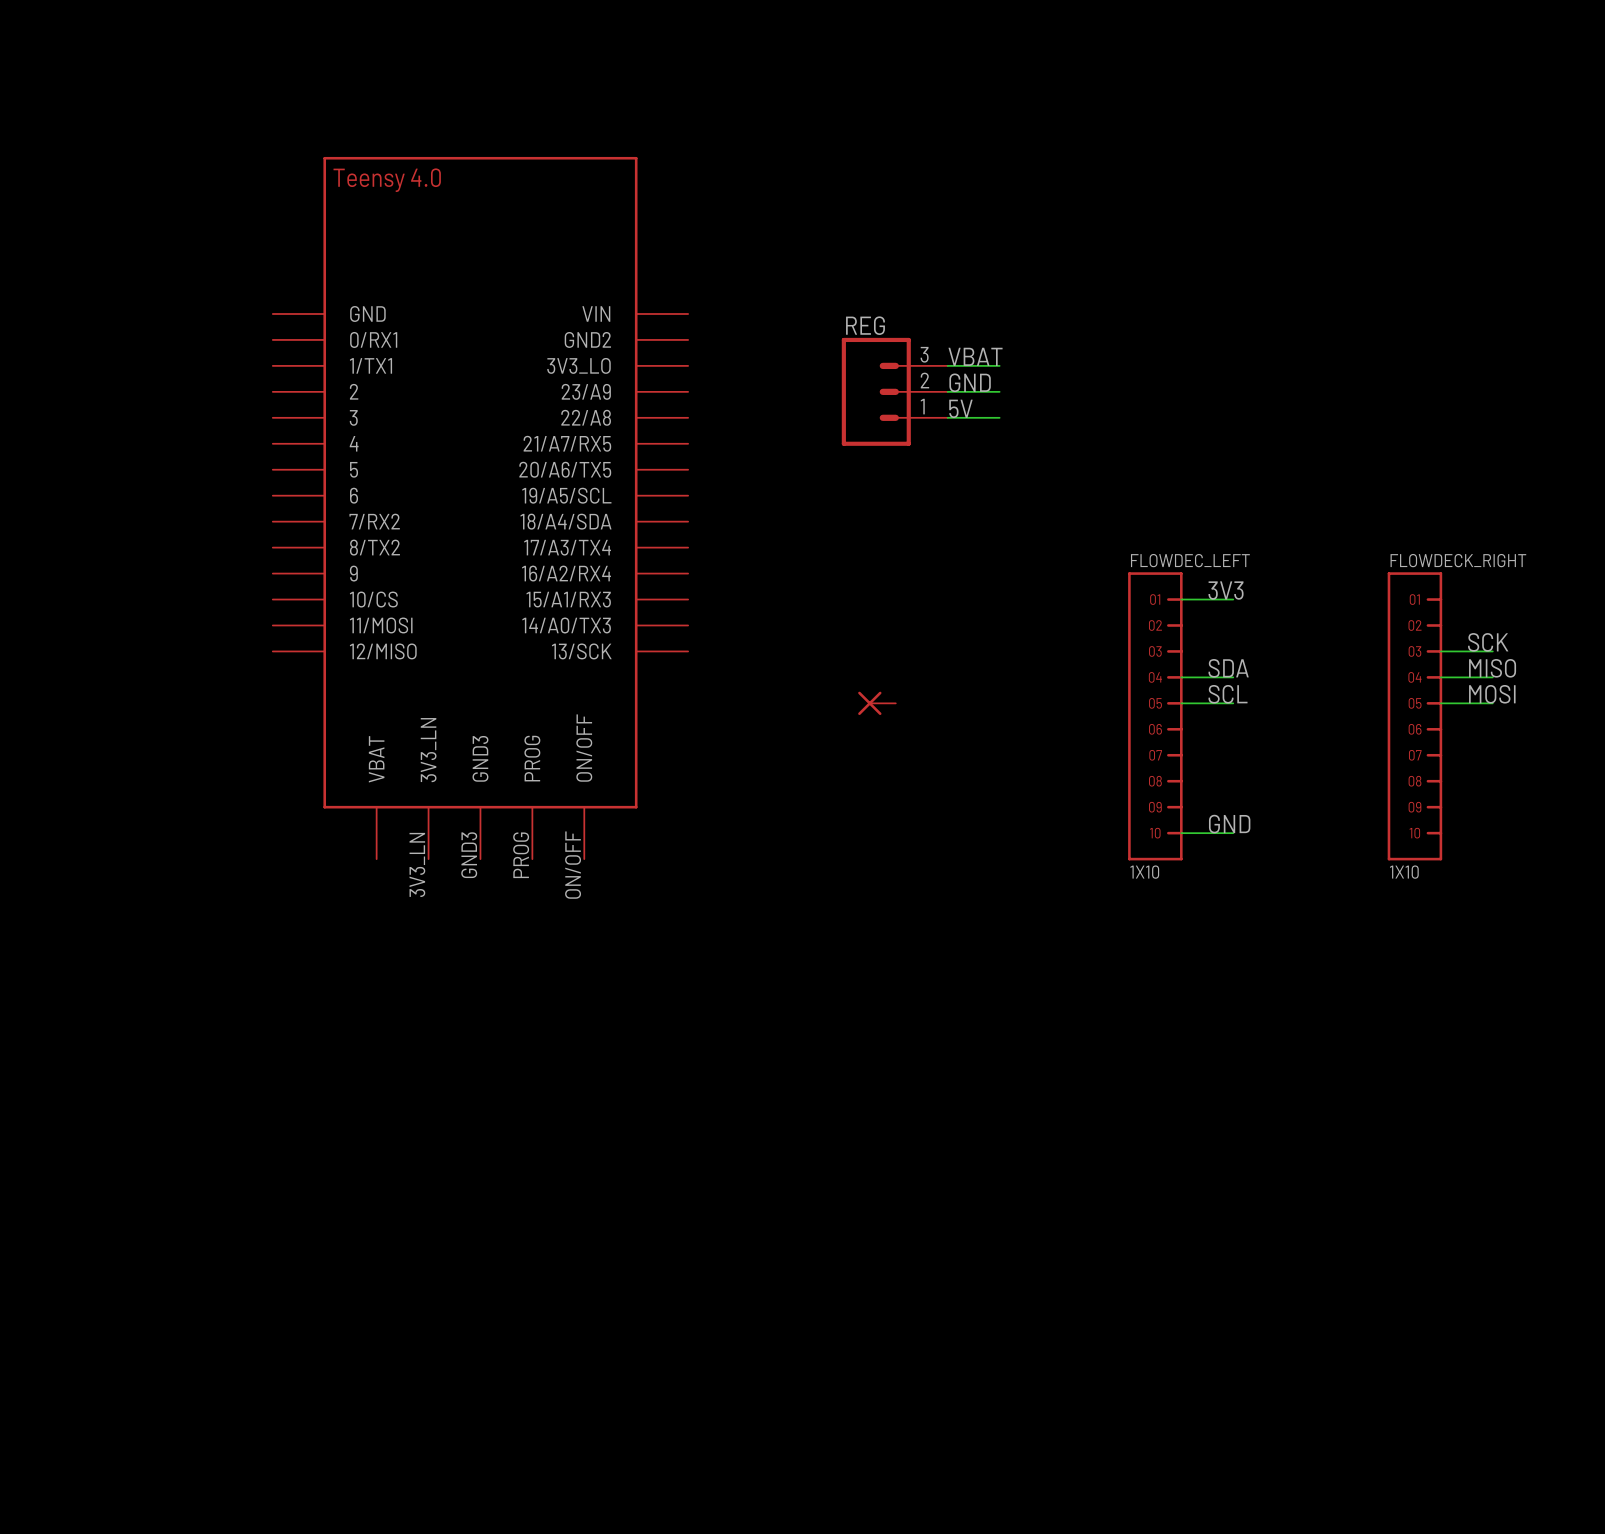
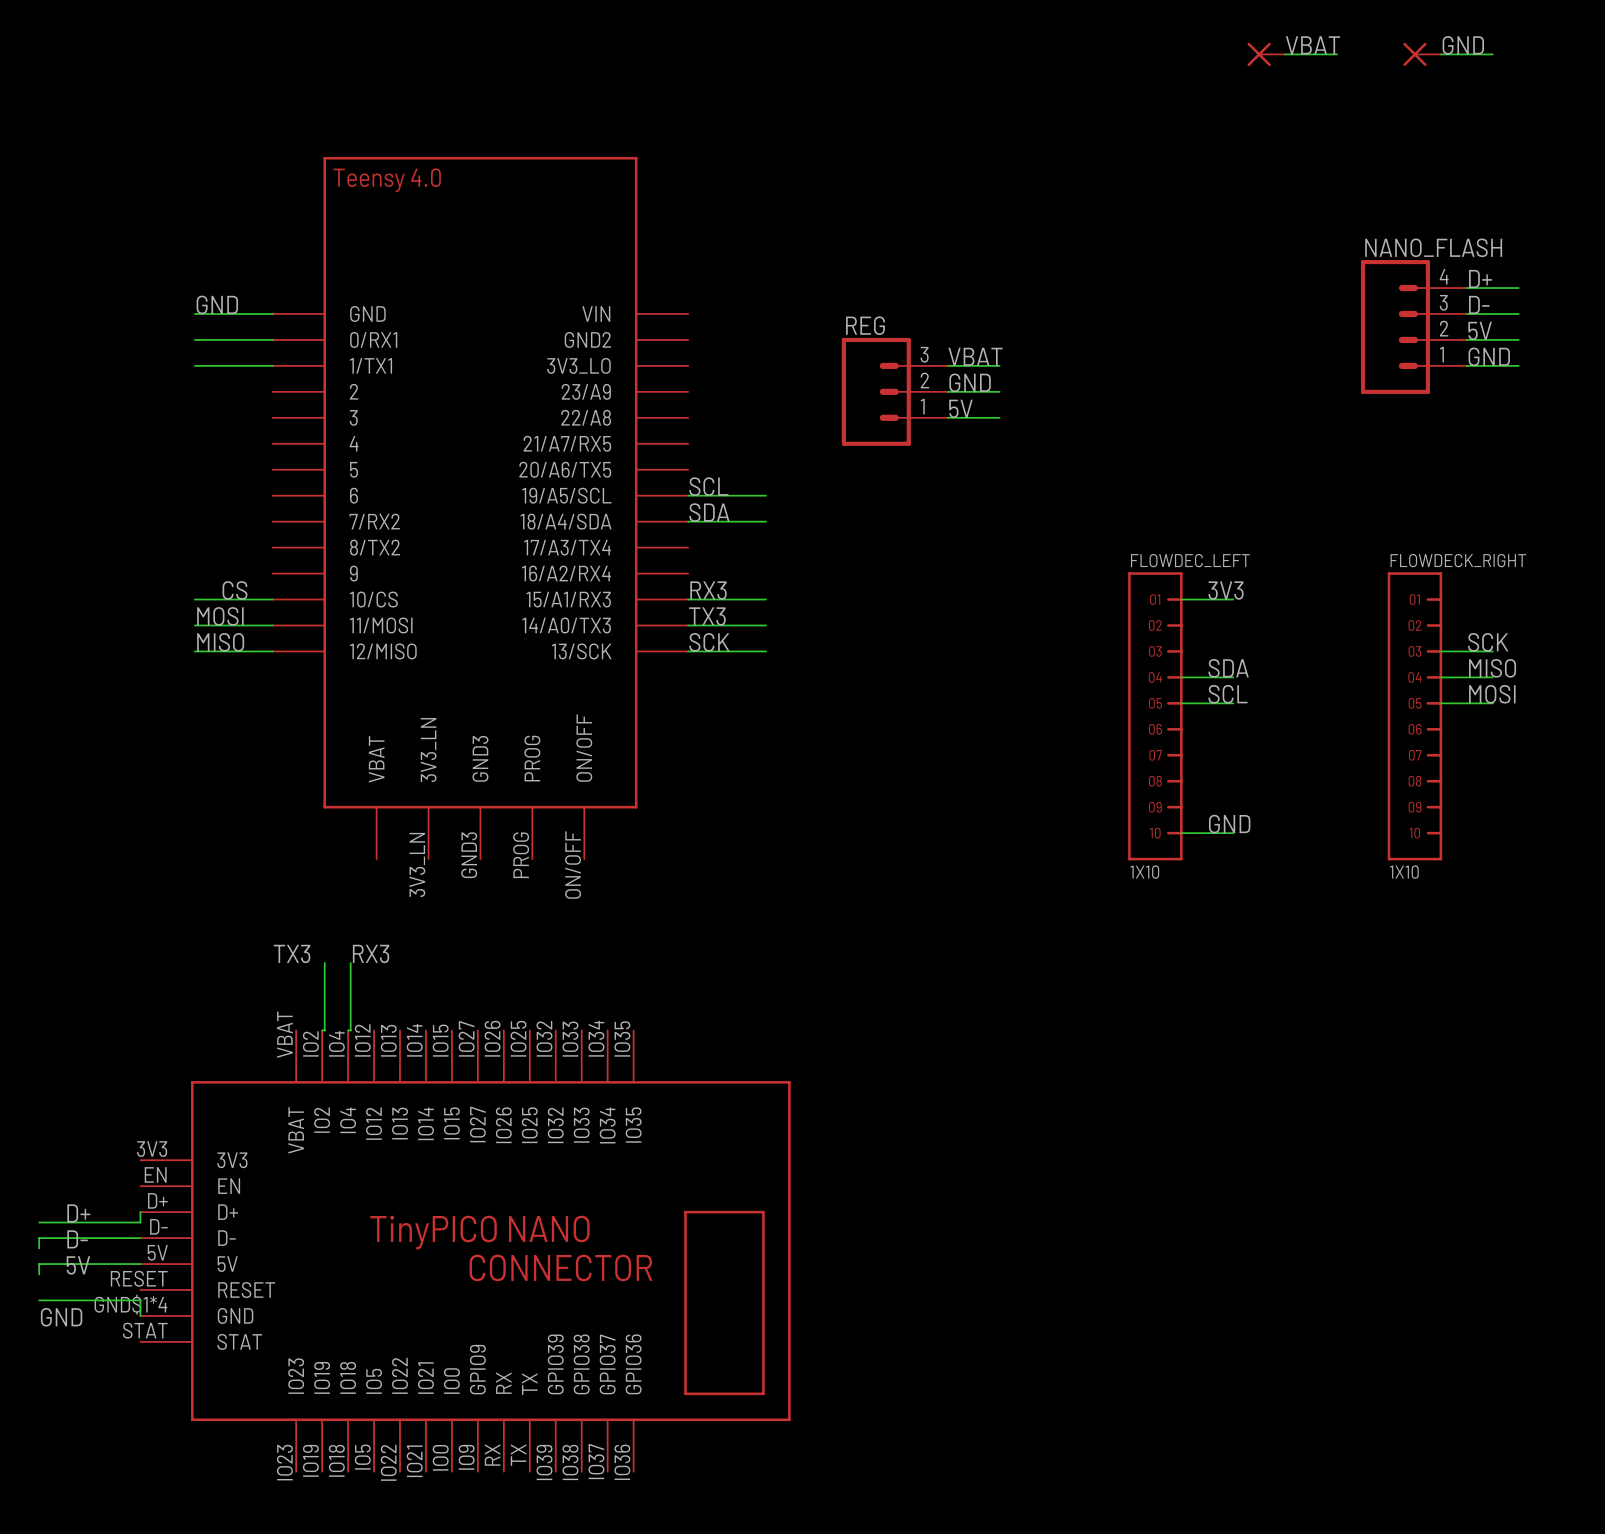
label: none -> VBAT (1312, 45)
label: none -> GND (1463, 45)
part: none -> (1266, 54)
wire: none -> (1285, 54) (1337, 54)
part: none -> (1422, 54)
wire: none -> (1440, 54) (1492, 54)
label: none -> D+ (1480, 278)
wire: none -> (1466, 288) (1518, 288)
label: none -> GND (217, 304)
label: none -> D- (1479, 304)
wire: none -> (194, 313) (272, 313)
wire: none -> (1466, 313) (1518, 313)
NANO_FLASH: none -> (1413, 326)
label: none -> 5V (1480, 330)
wire: none -> (194, 339) (272, 339)
wire: none -> (1466, 339) (1518, 339)
label: none -> GND (1489, 356)
wire: none -> (194, 365) (272, 365)
wire: none -> (1466, 365) (1518, 365)
label: none -> SCL (708, 486)
wire: none -> (688, 495) (765, 495)
label: none -> SDA (709, 512)
wire: none -> (688, 521) (765, 521)
label: none -> CS (235, 590)
label: none -> RX3 (708, 590)
wire: none -> (194, 599) (272, 599)
wire: none -> (688, 599) (765, 599)
label: none -> MOSI (220, 616)
label: none -> TX3 (707, 616)
wire: none -> (194, 625) (272, 625)
wire: none -> (688, 625) (765, 625)
label: none -> MISO (220, 642)
label: none -> SCK (709, 642)
wire: none -> (194, 651) (272, 651)
wire: none -> (688, 651) (765, 651)
part: (876, 703) -> none
label: none -> TX3 (292, 953)
label: none -> RX3 (371, 953)
wire: none -> (324, 962) (324, 1030) (322, 1030)
wire: none -> (350, 962) (350, 1030) (348, 1030)
wire: none -> (140, 1212) (140, 1222) (39, 1222)
label: none -> D+ (78, 1213)
wire: none -> (140, 1238) (39, 1238) (39, 1248)
label: none -> D- (77, 1239)
part: none -> (465, 1251)
wire: none -> (140, 1264) (39, 1264) (39, 1274)
label: none -> 5V (78, 1265)
wire: none -> (39, 1300) (140, 1300) (140, 1315)
label: none -> GND (61, 1317)

